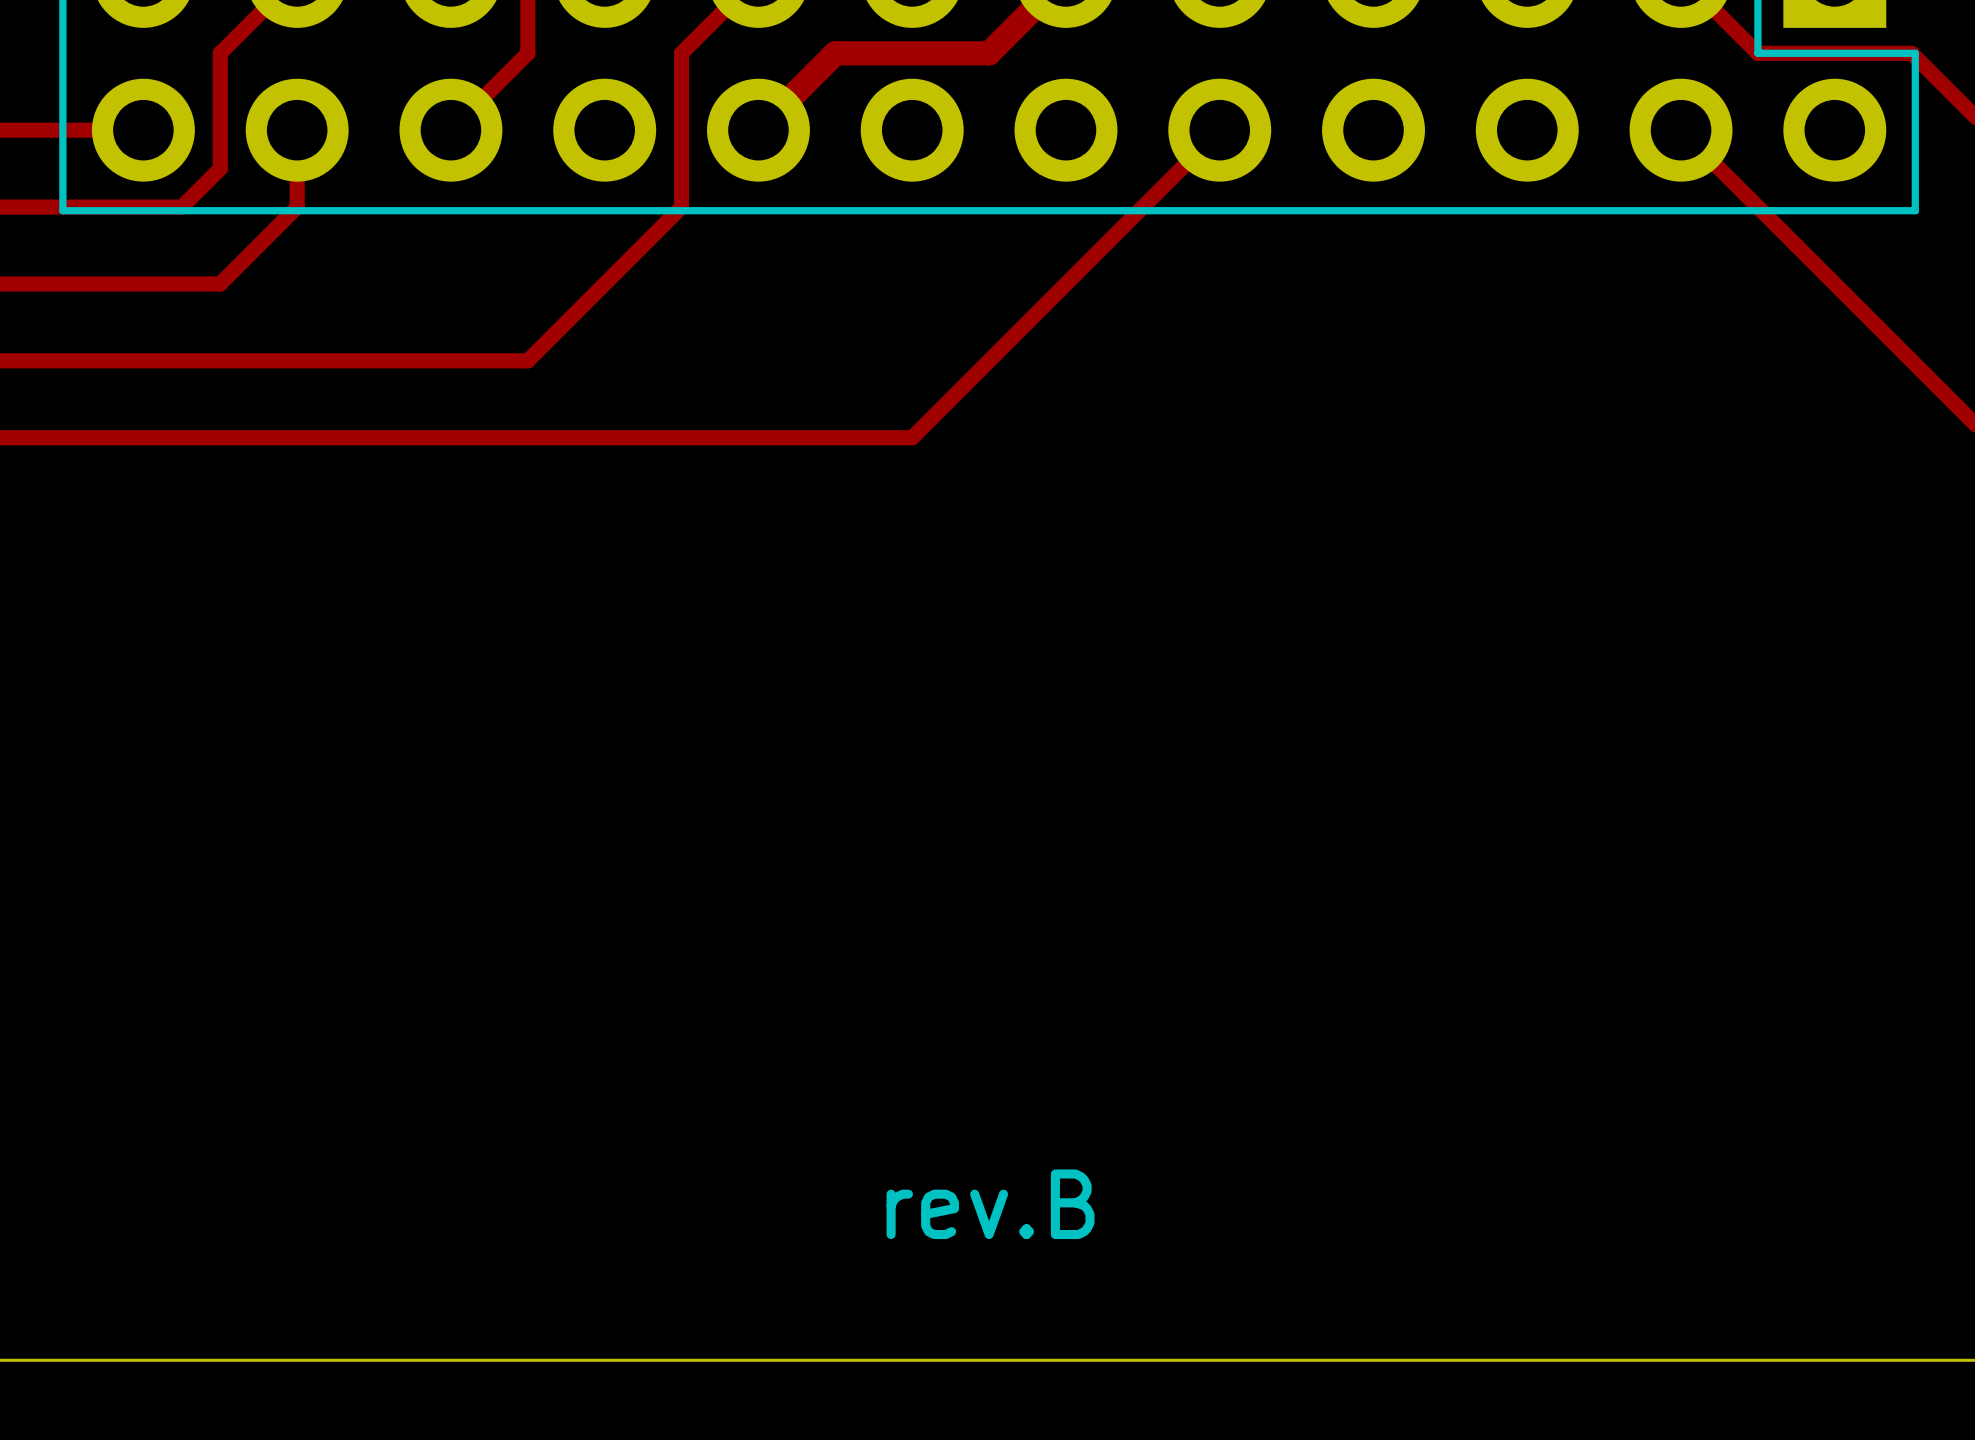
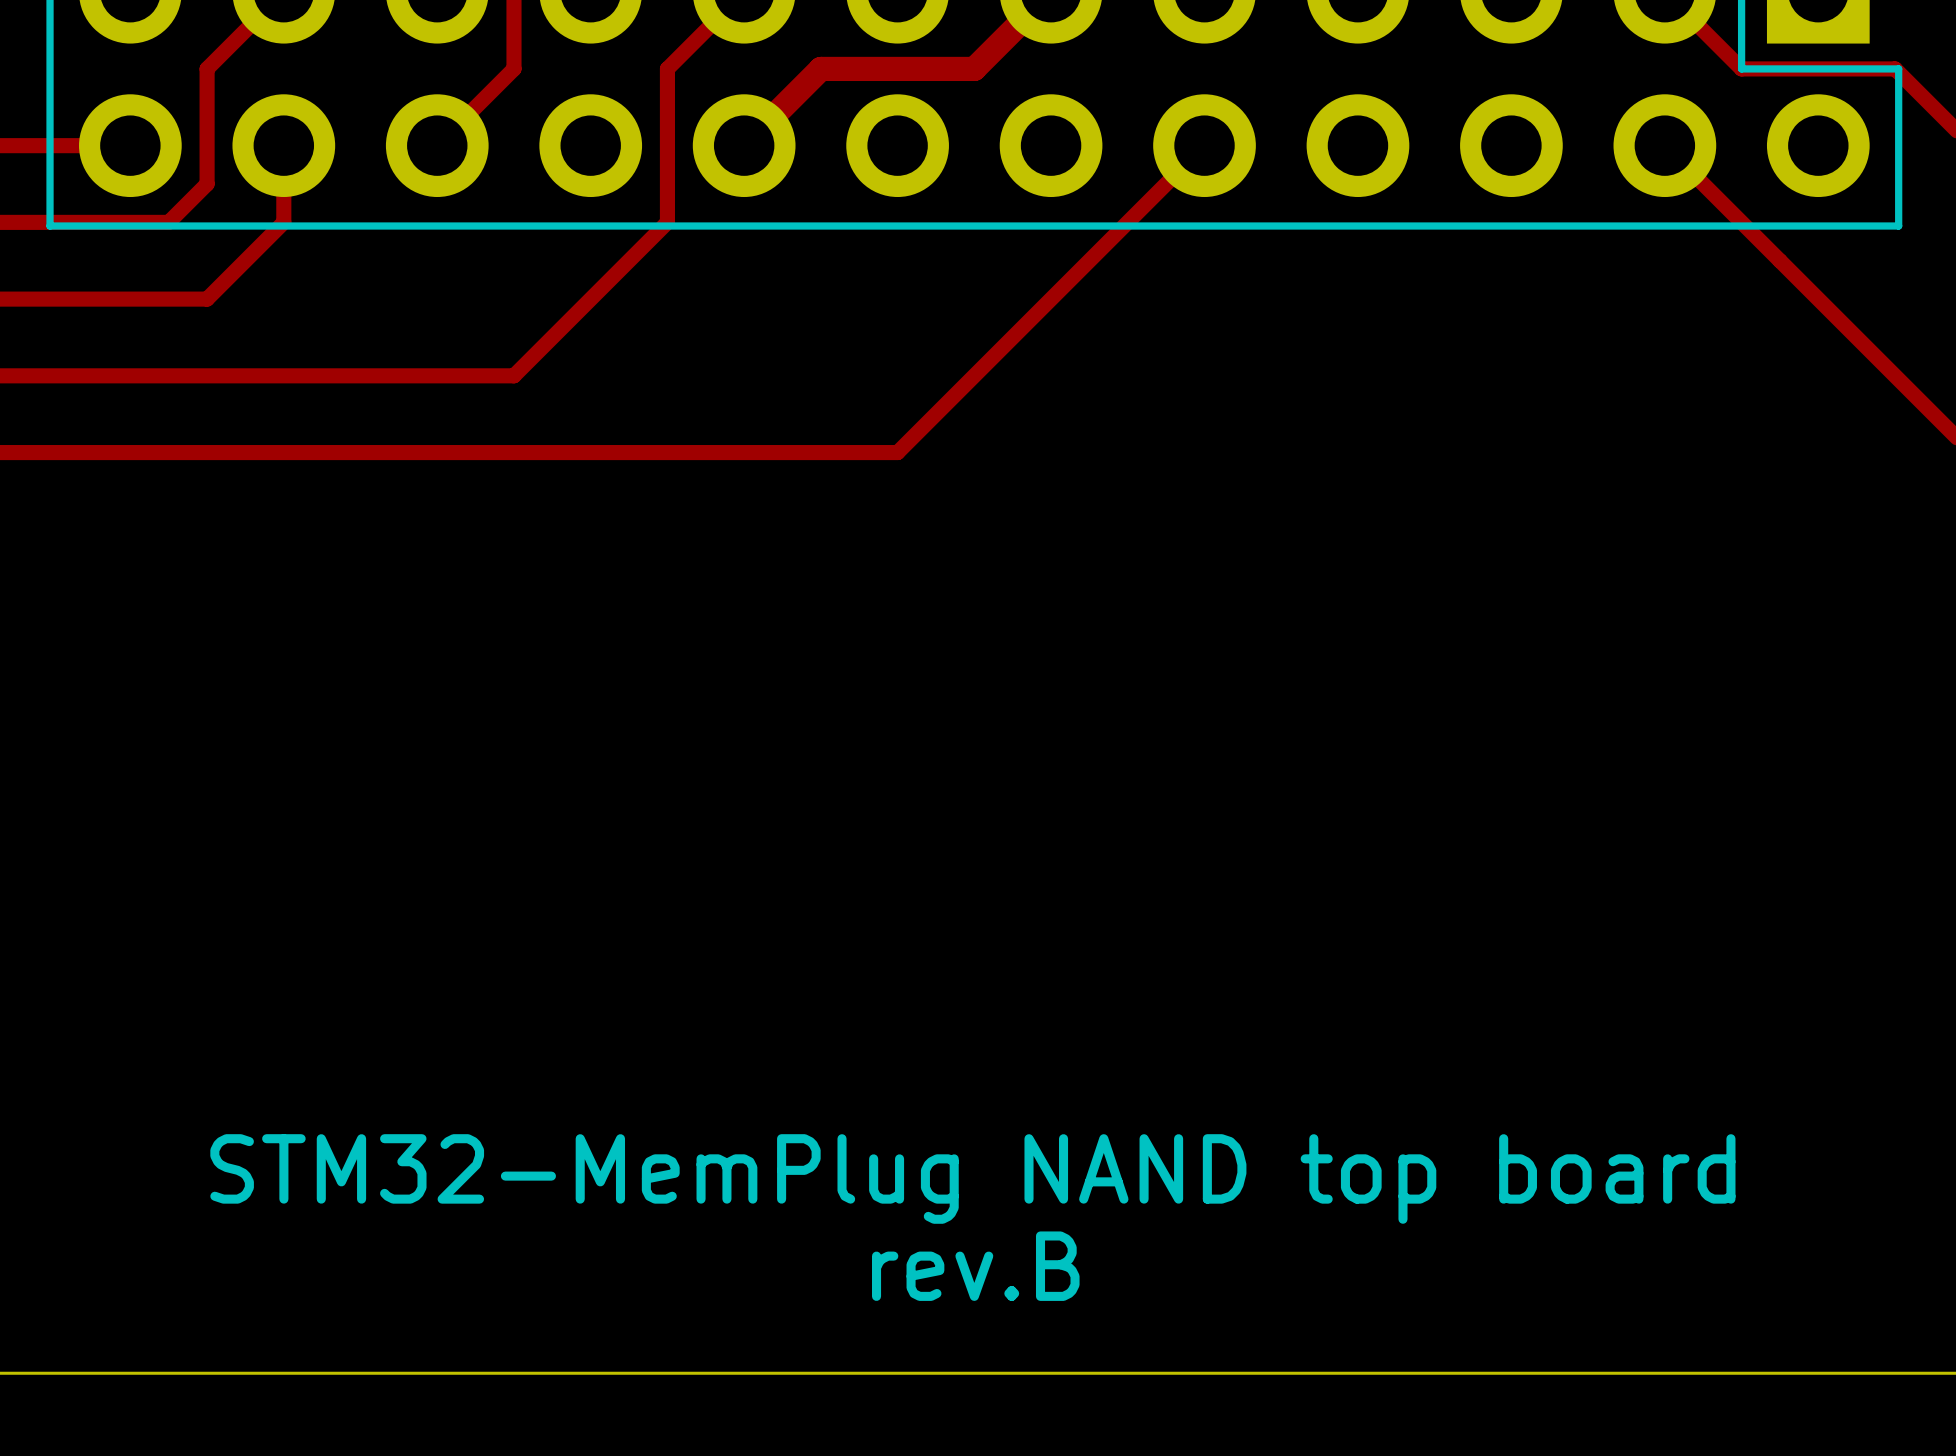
text: none -> STM32-MemPlug NAND top board (972, 1178)
text position: rev.B (990, 1204) -> rev.B (975, 1266)

